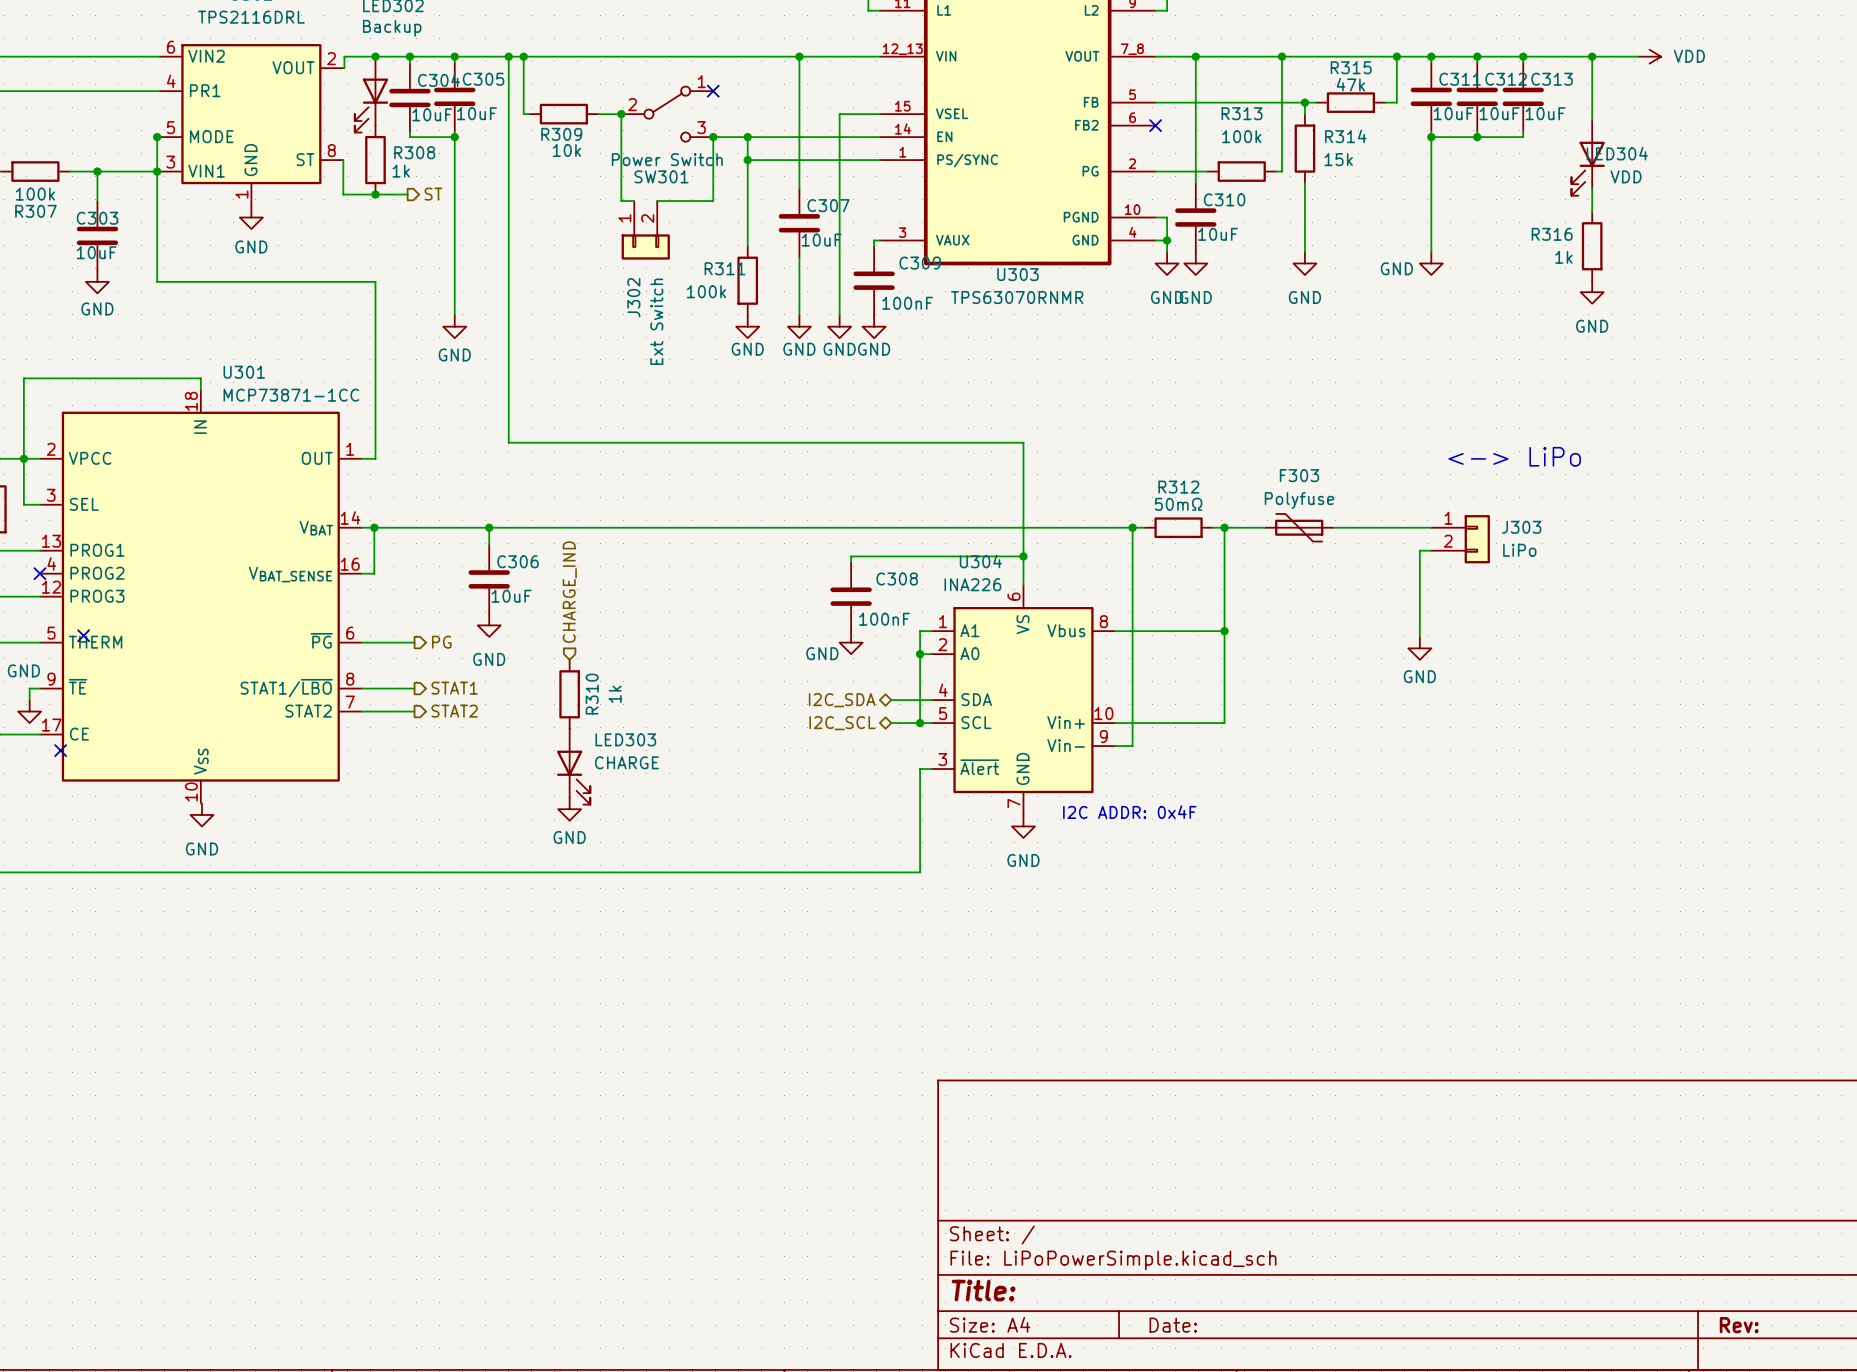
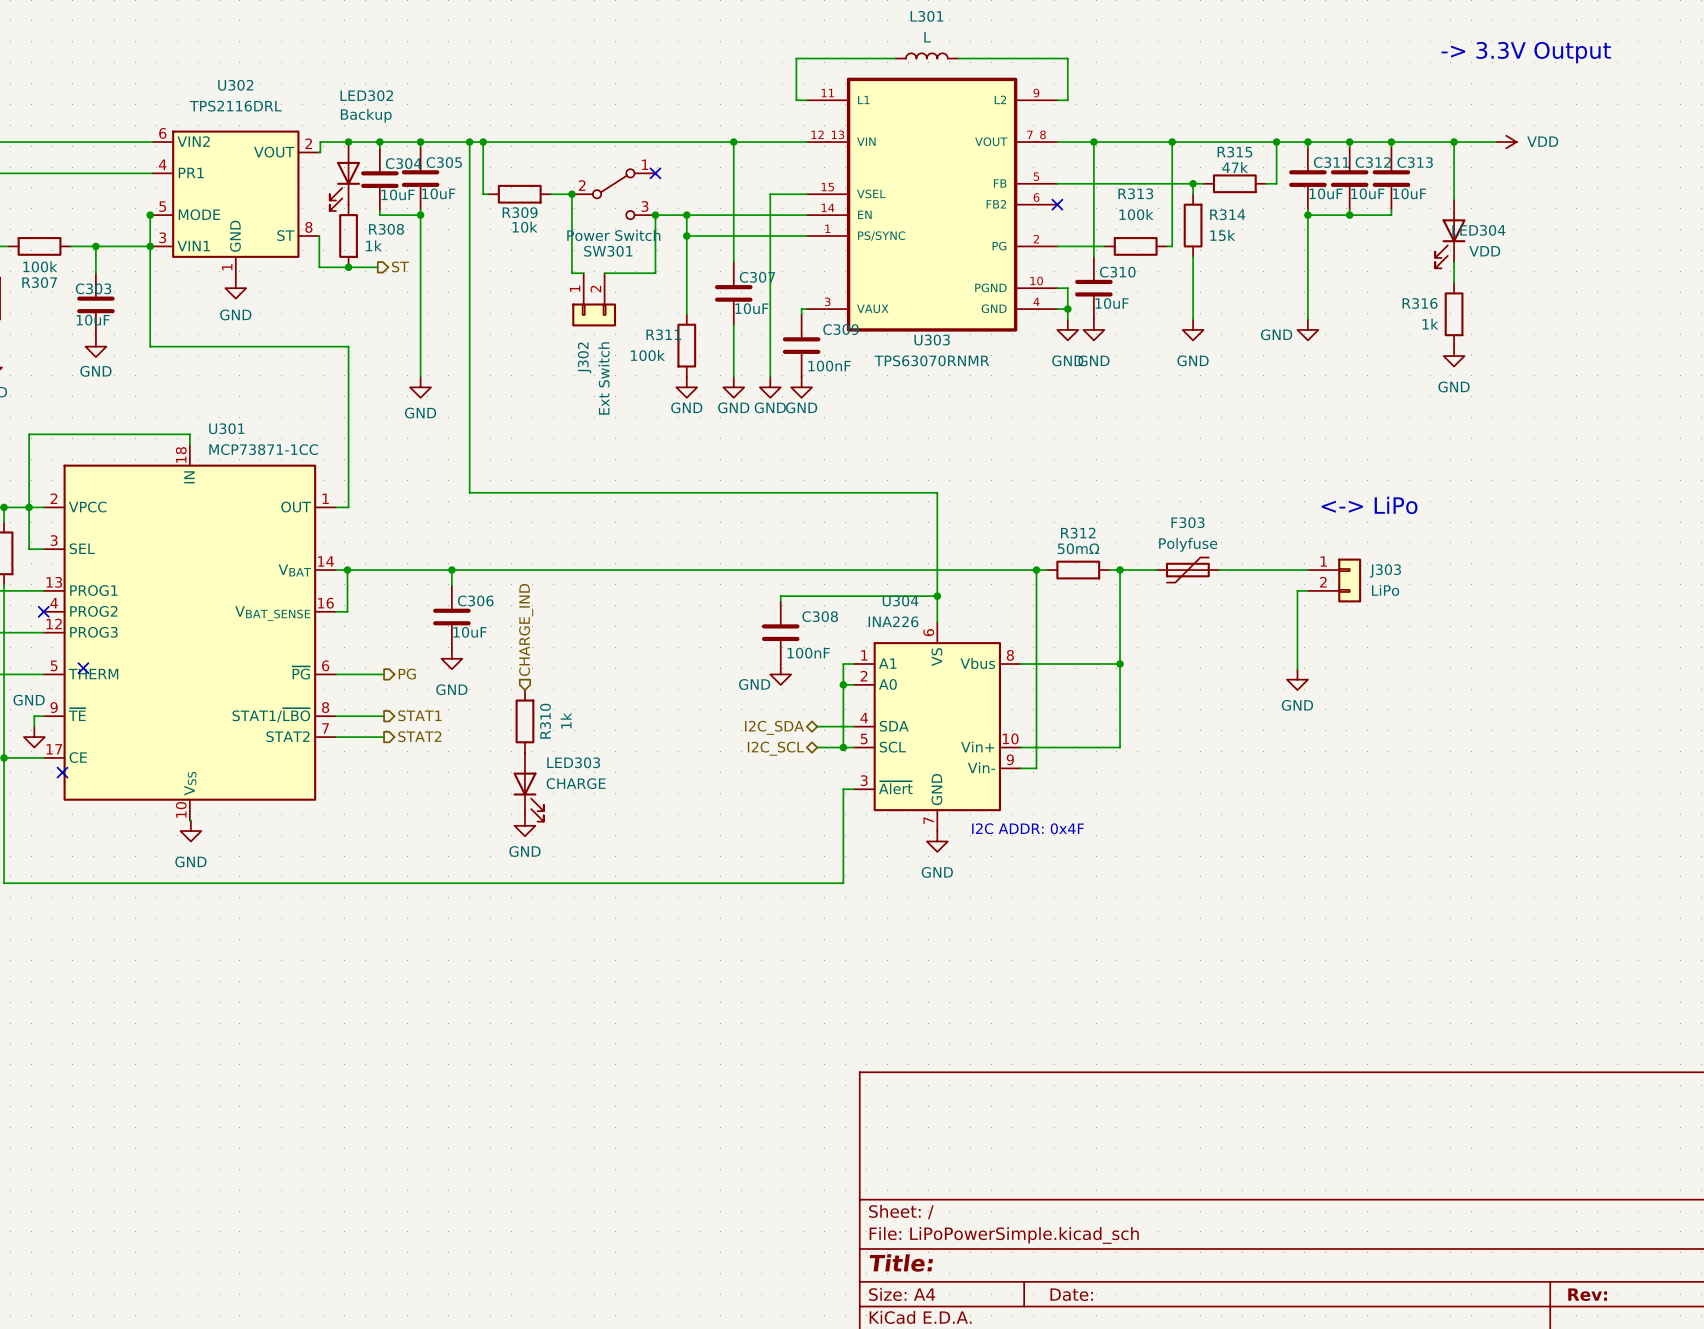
F303 flip: as is (1299, 527) -> left-right (1187, 570)

